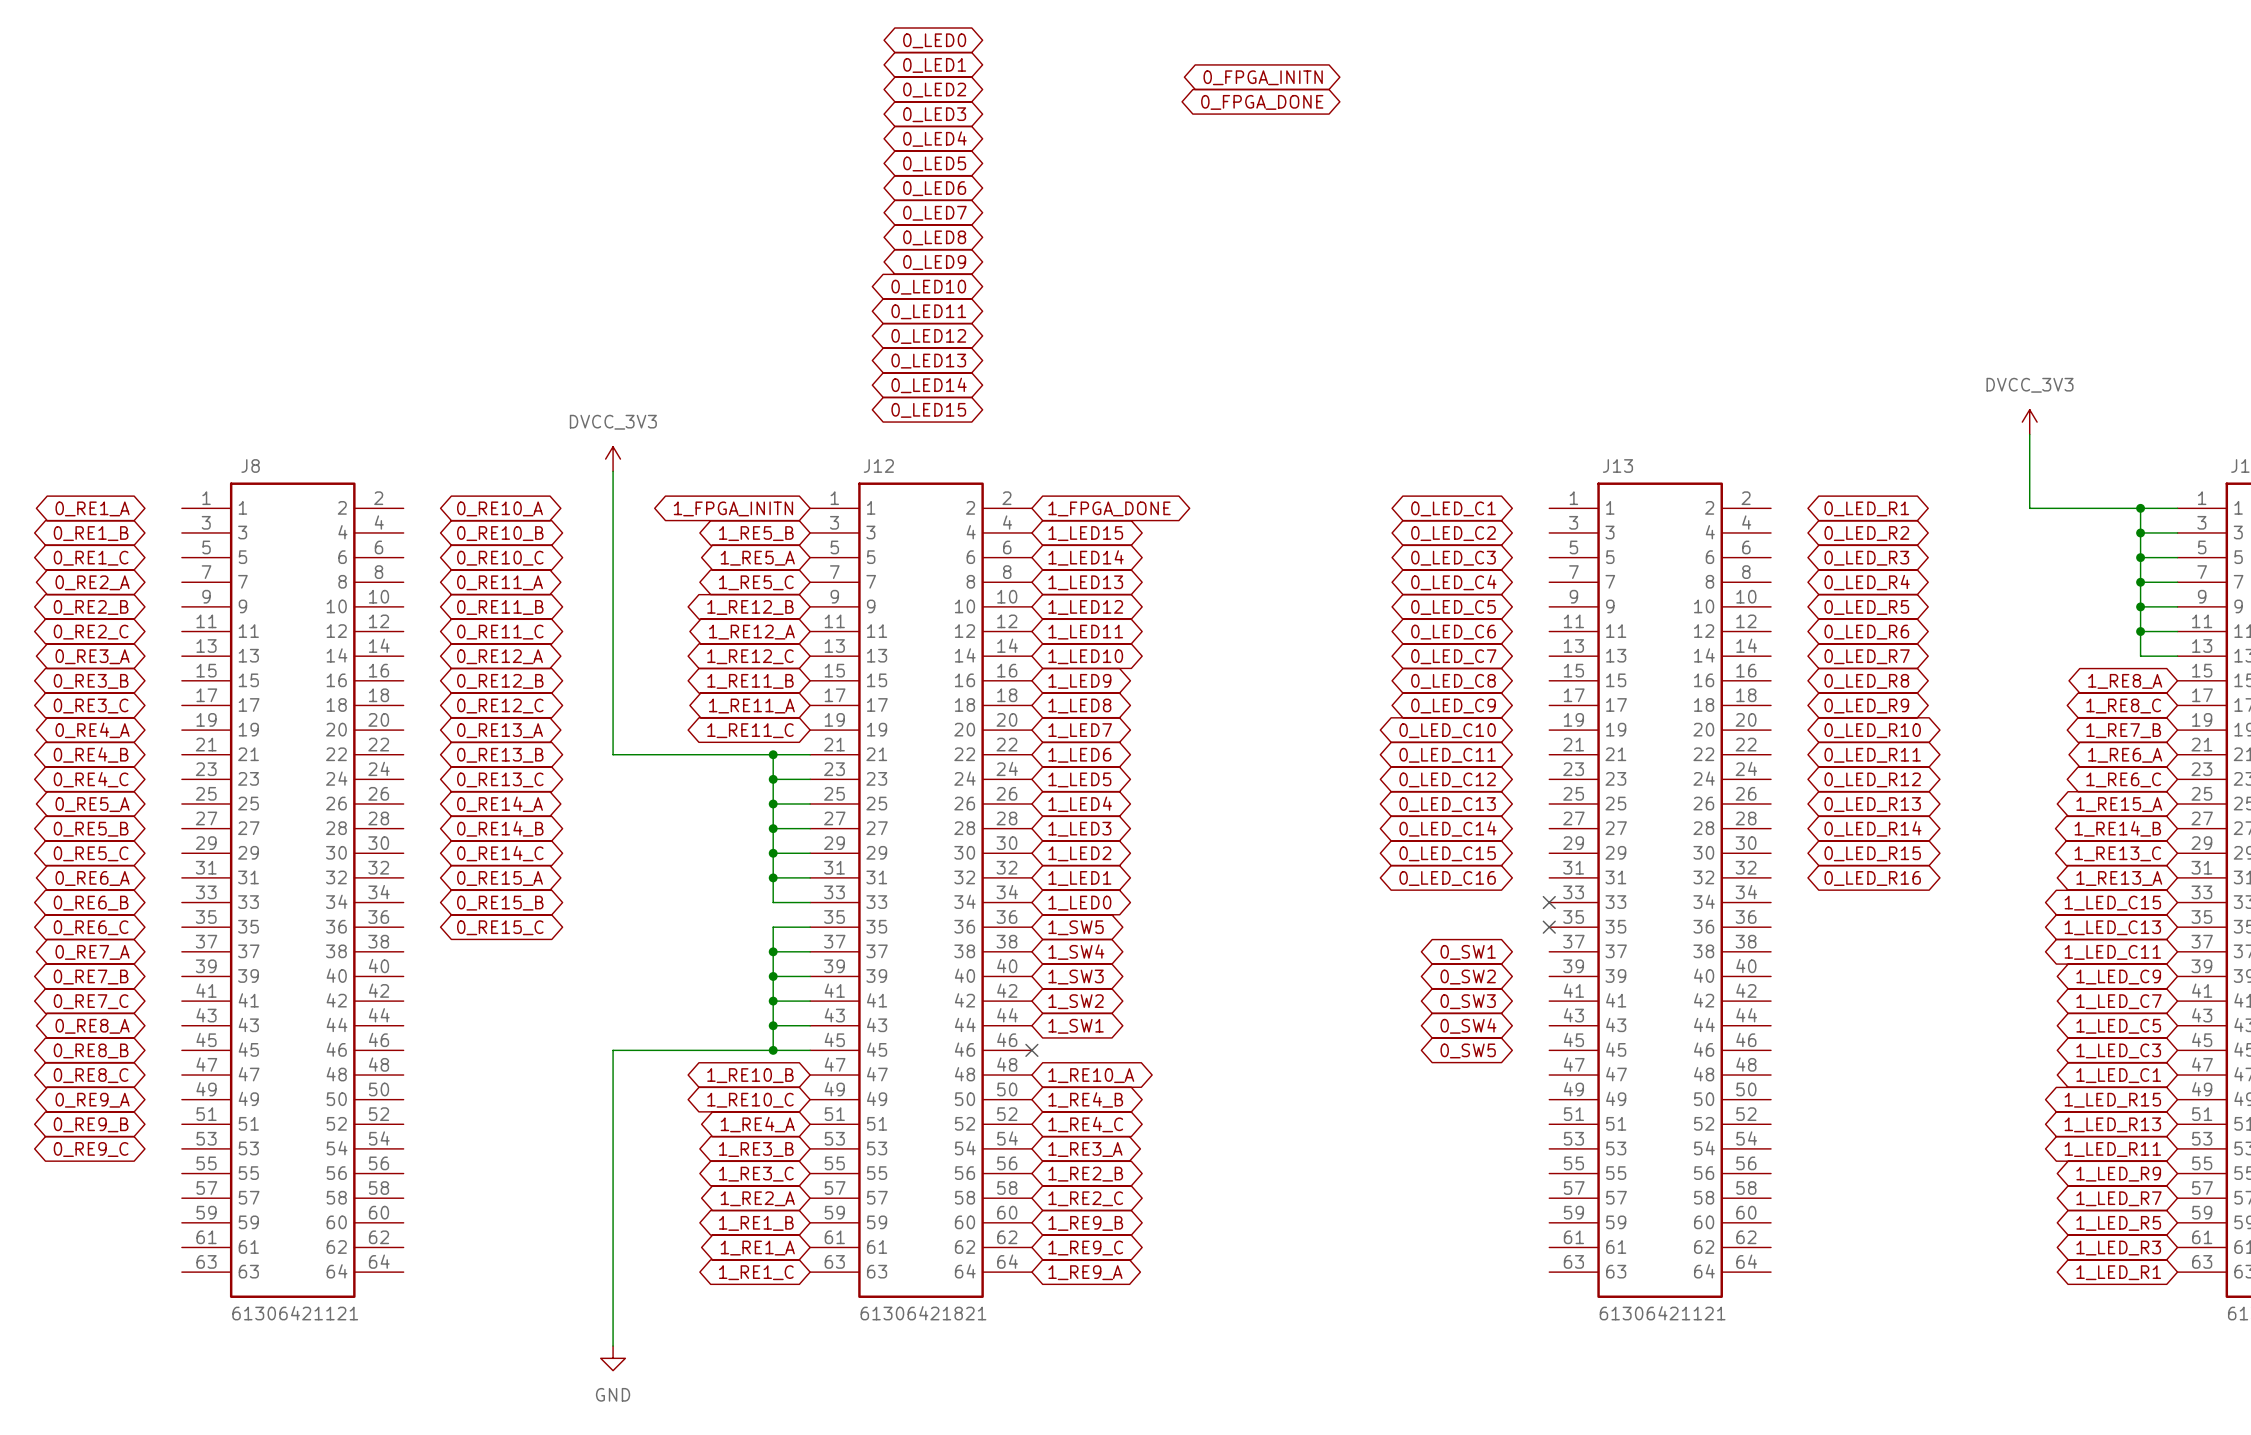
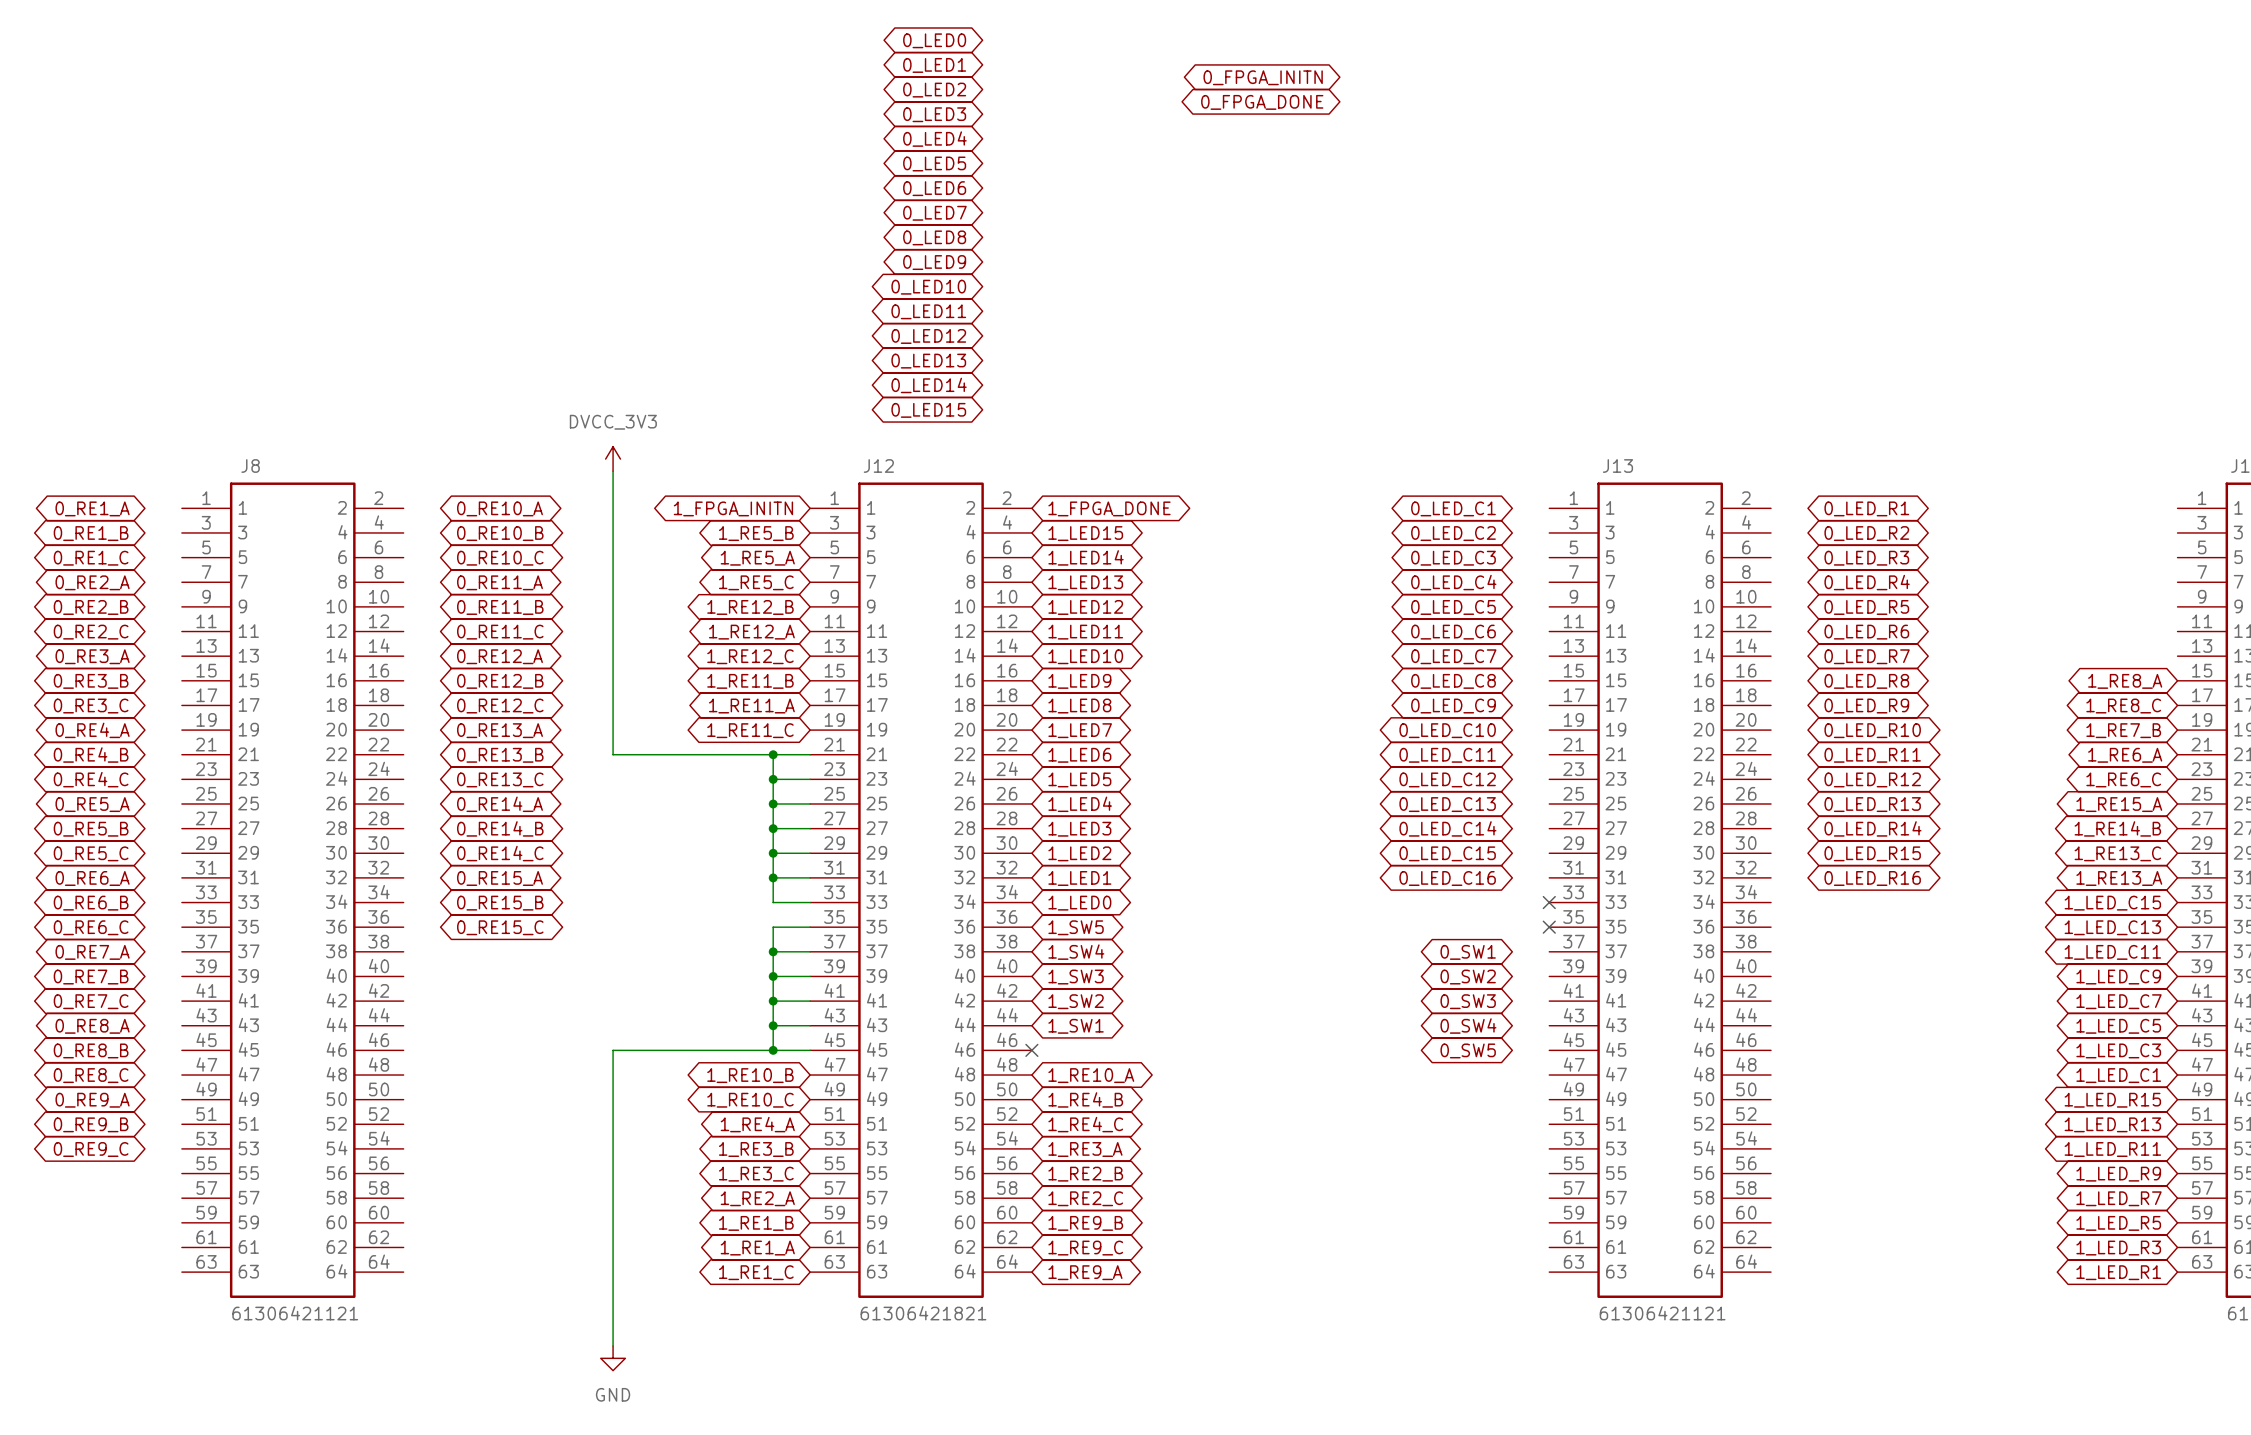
power symbol: DVCC_3V3 (2029, 422) -> none
wire: (2029, 434) (2029, 508) (2177, 508) -> none
wire: (2140, 508) (2140, 656) (2177, 656) -> none
junction: (2140, 508) -> none
wire: (2140, 532) (2177, 532) -> none
junction: (2140, 532) -> none
wire: (2140, 557) (2177, 557) -> none
junction: (2140, 557) -> none
wire: (2140, 582) (2177, 582) -> none
junction: (2140, 582) -> none
wire: (2140, 606) (2177, 606) -> none
junction: (2140, 606) -> none
wire: (2140, 631) (2177, 631) -> none
junction: (2140, 631) -> none

